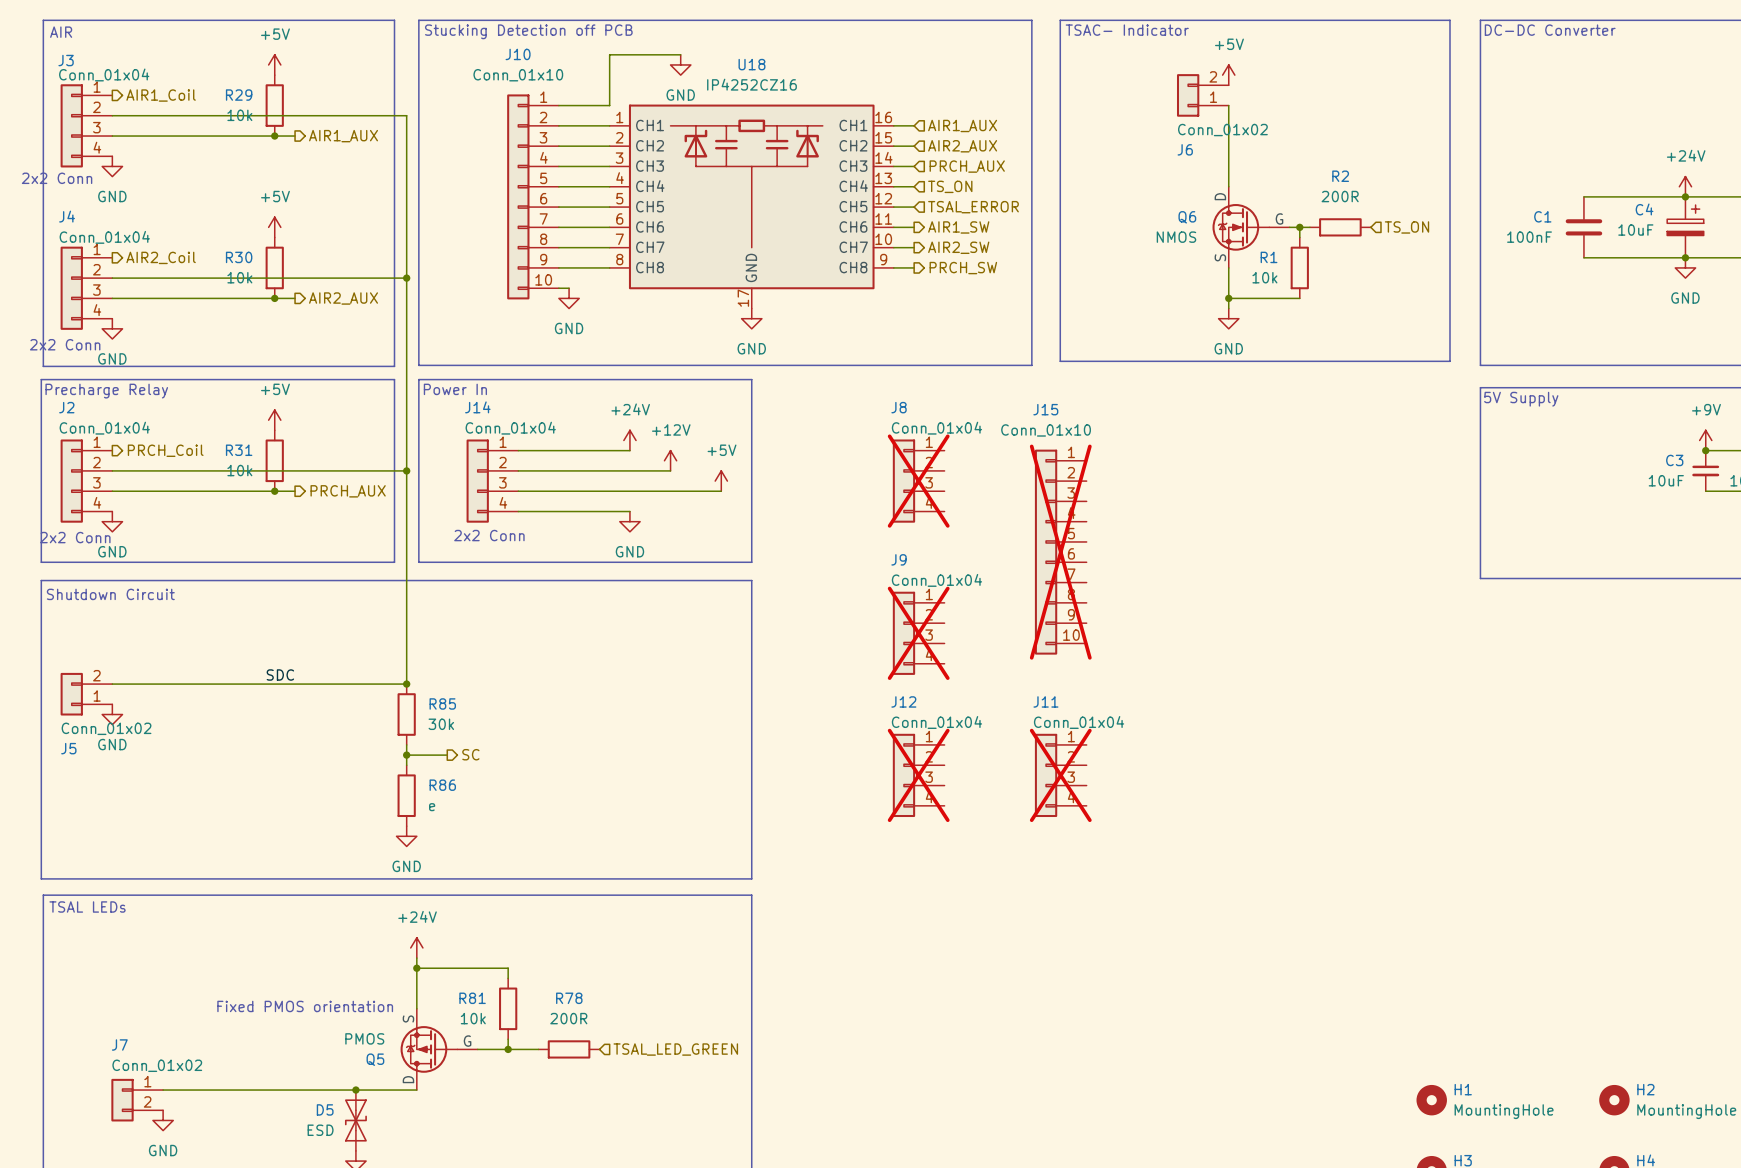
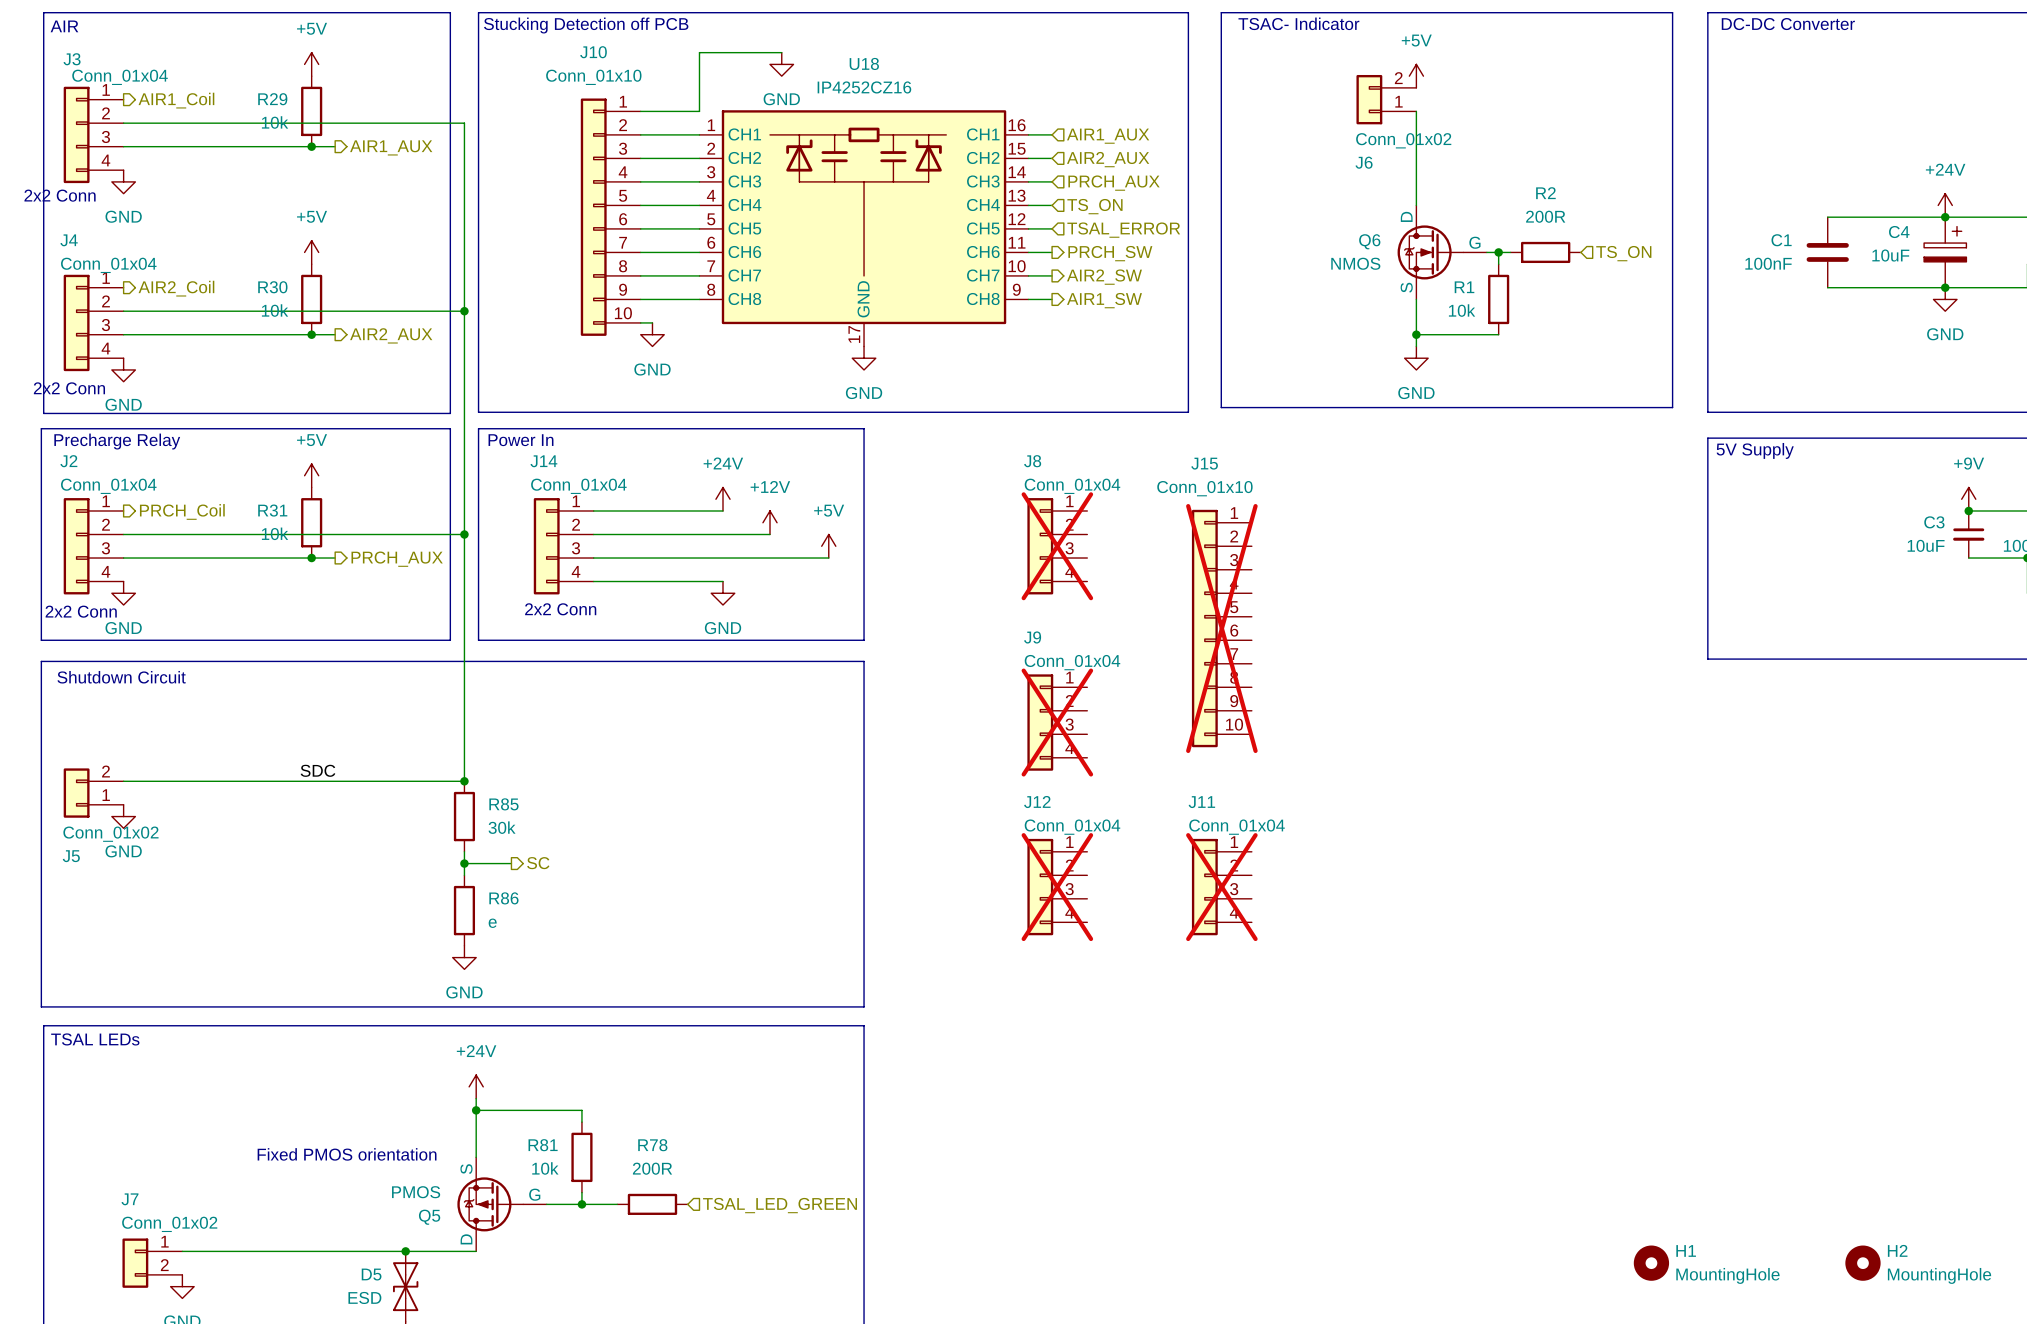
hierarchical label: AIR1_SW (958, 227) -> PRCH_SW (1110, 253)
hierarchical label: PRCH_SW (963, 268) -> AIR1_SW (1104, 300)

